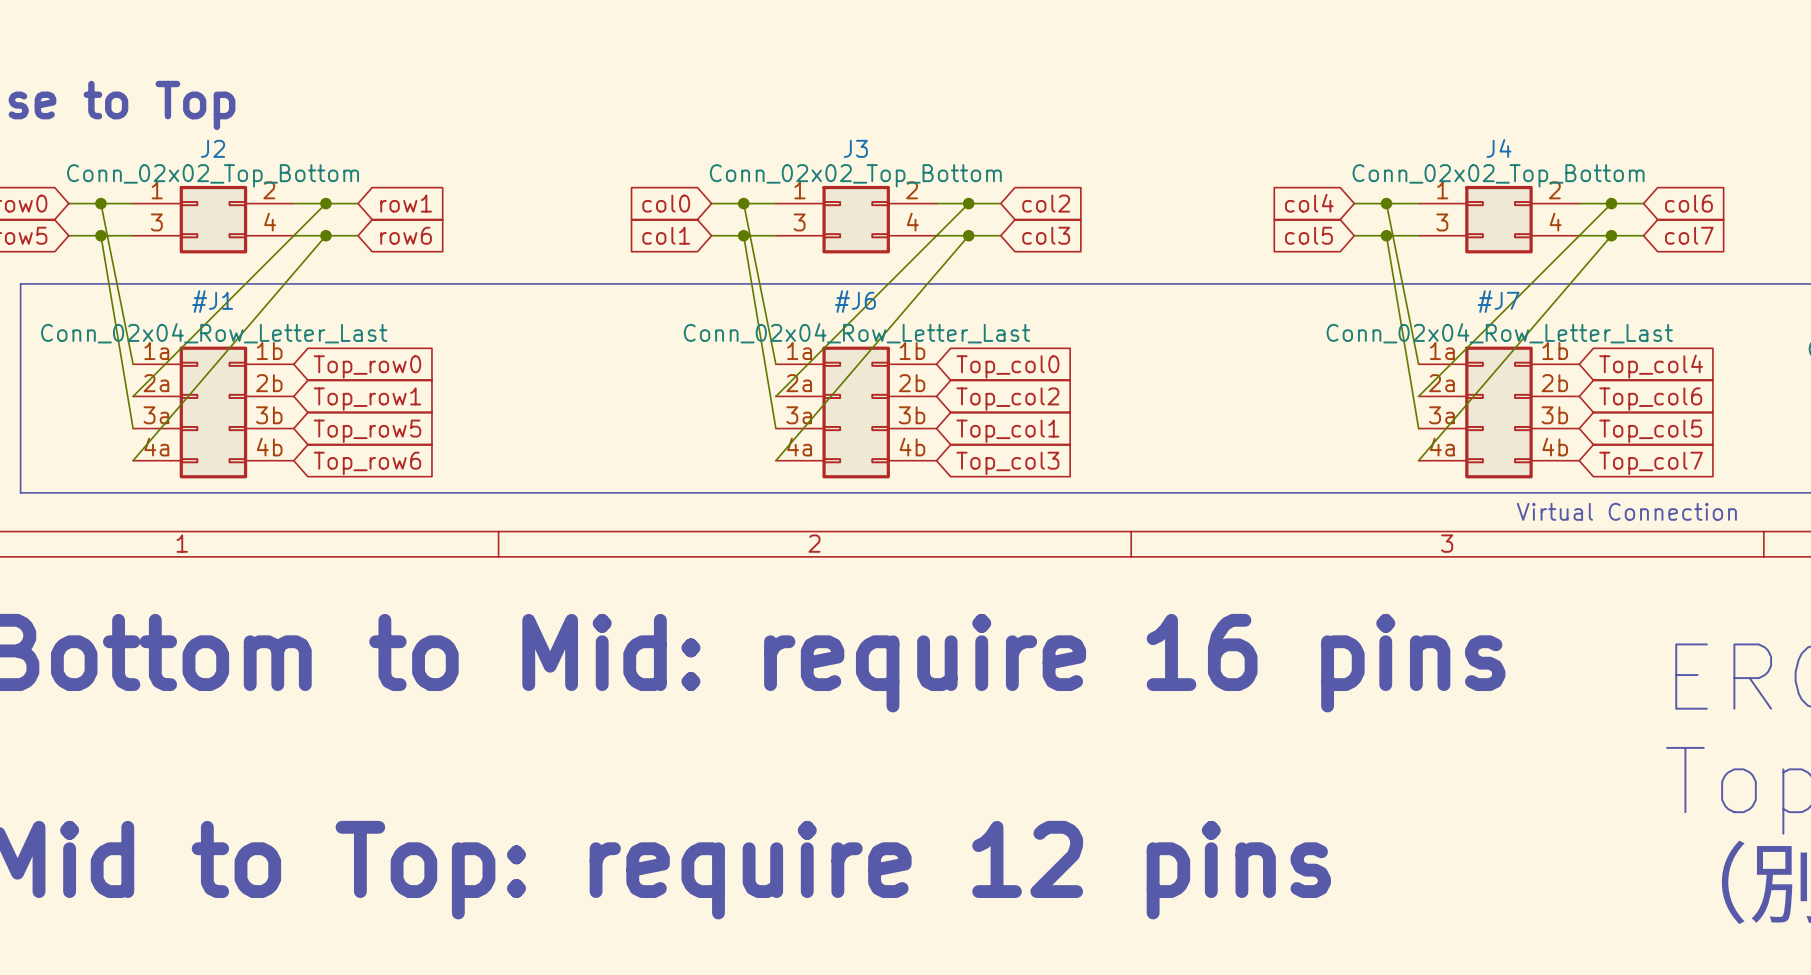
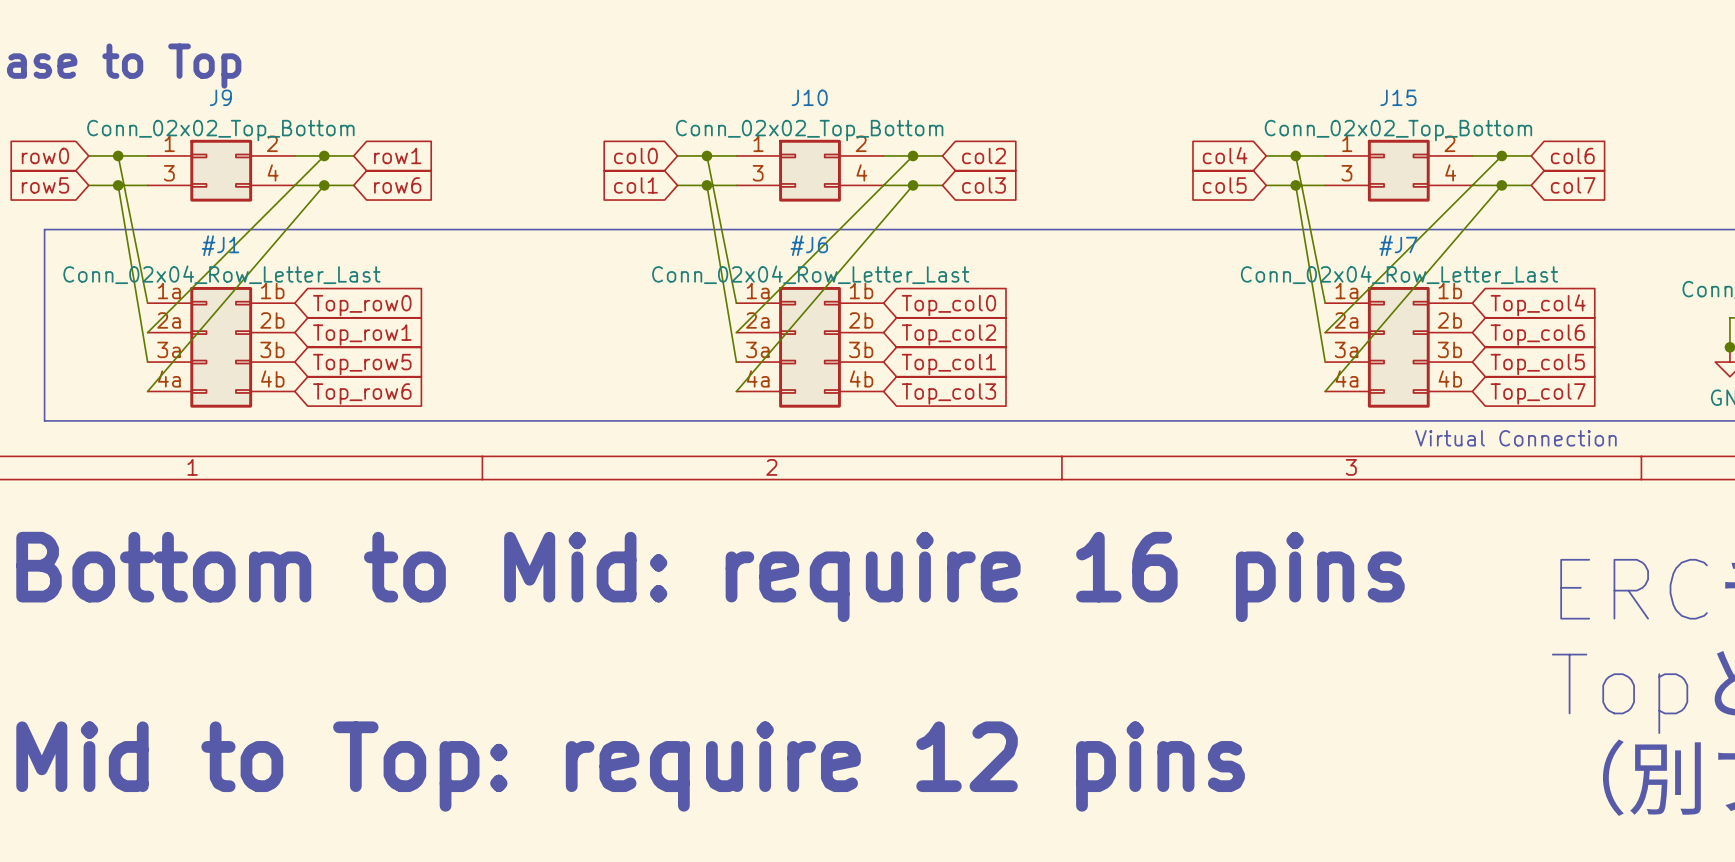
J2 name: J2 (213, 148) -> J9 (220, 97)
J3 name: J3 (855, 148) -> J10 (809, 97)
J4 name: J4 (1498, 148) -> J15 (1398, 97)

